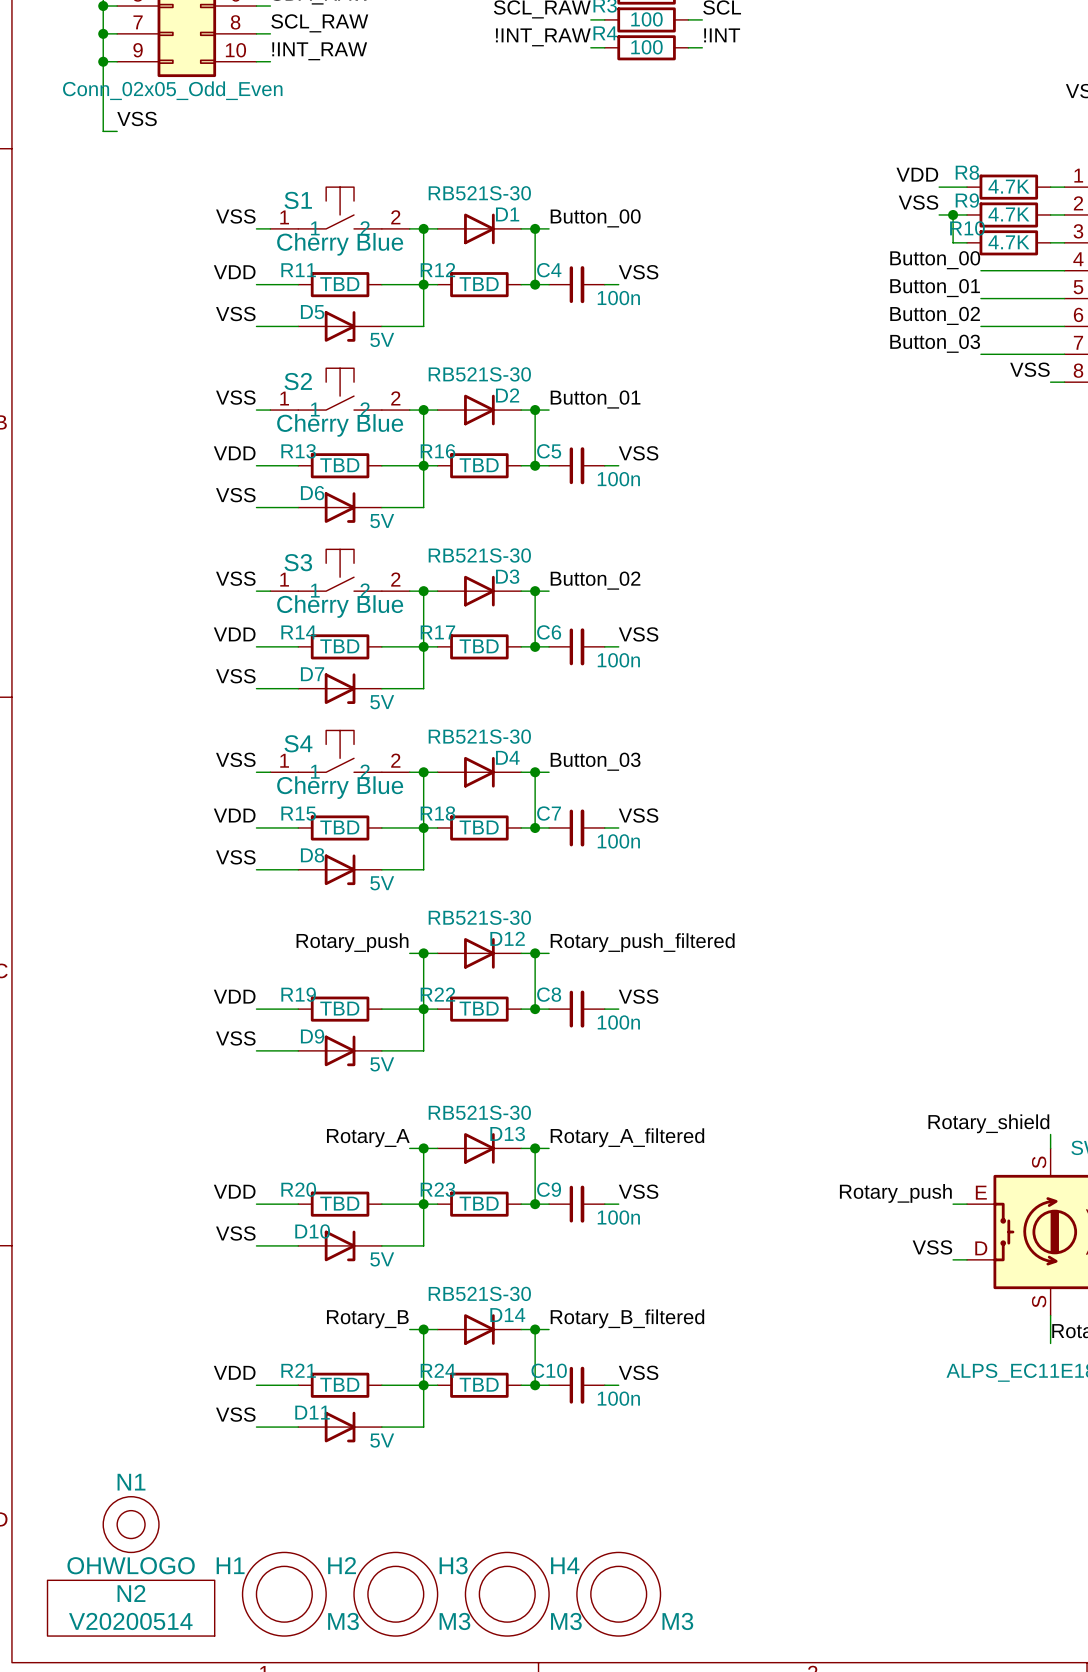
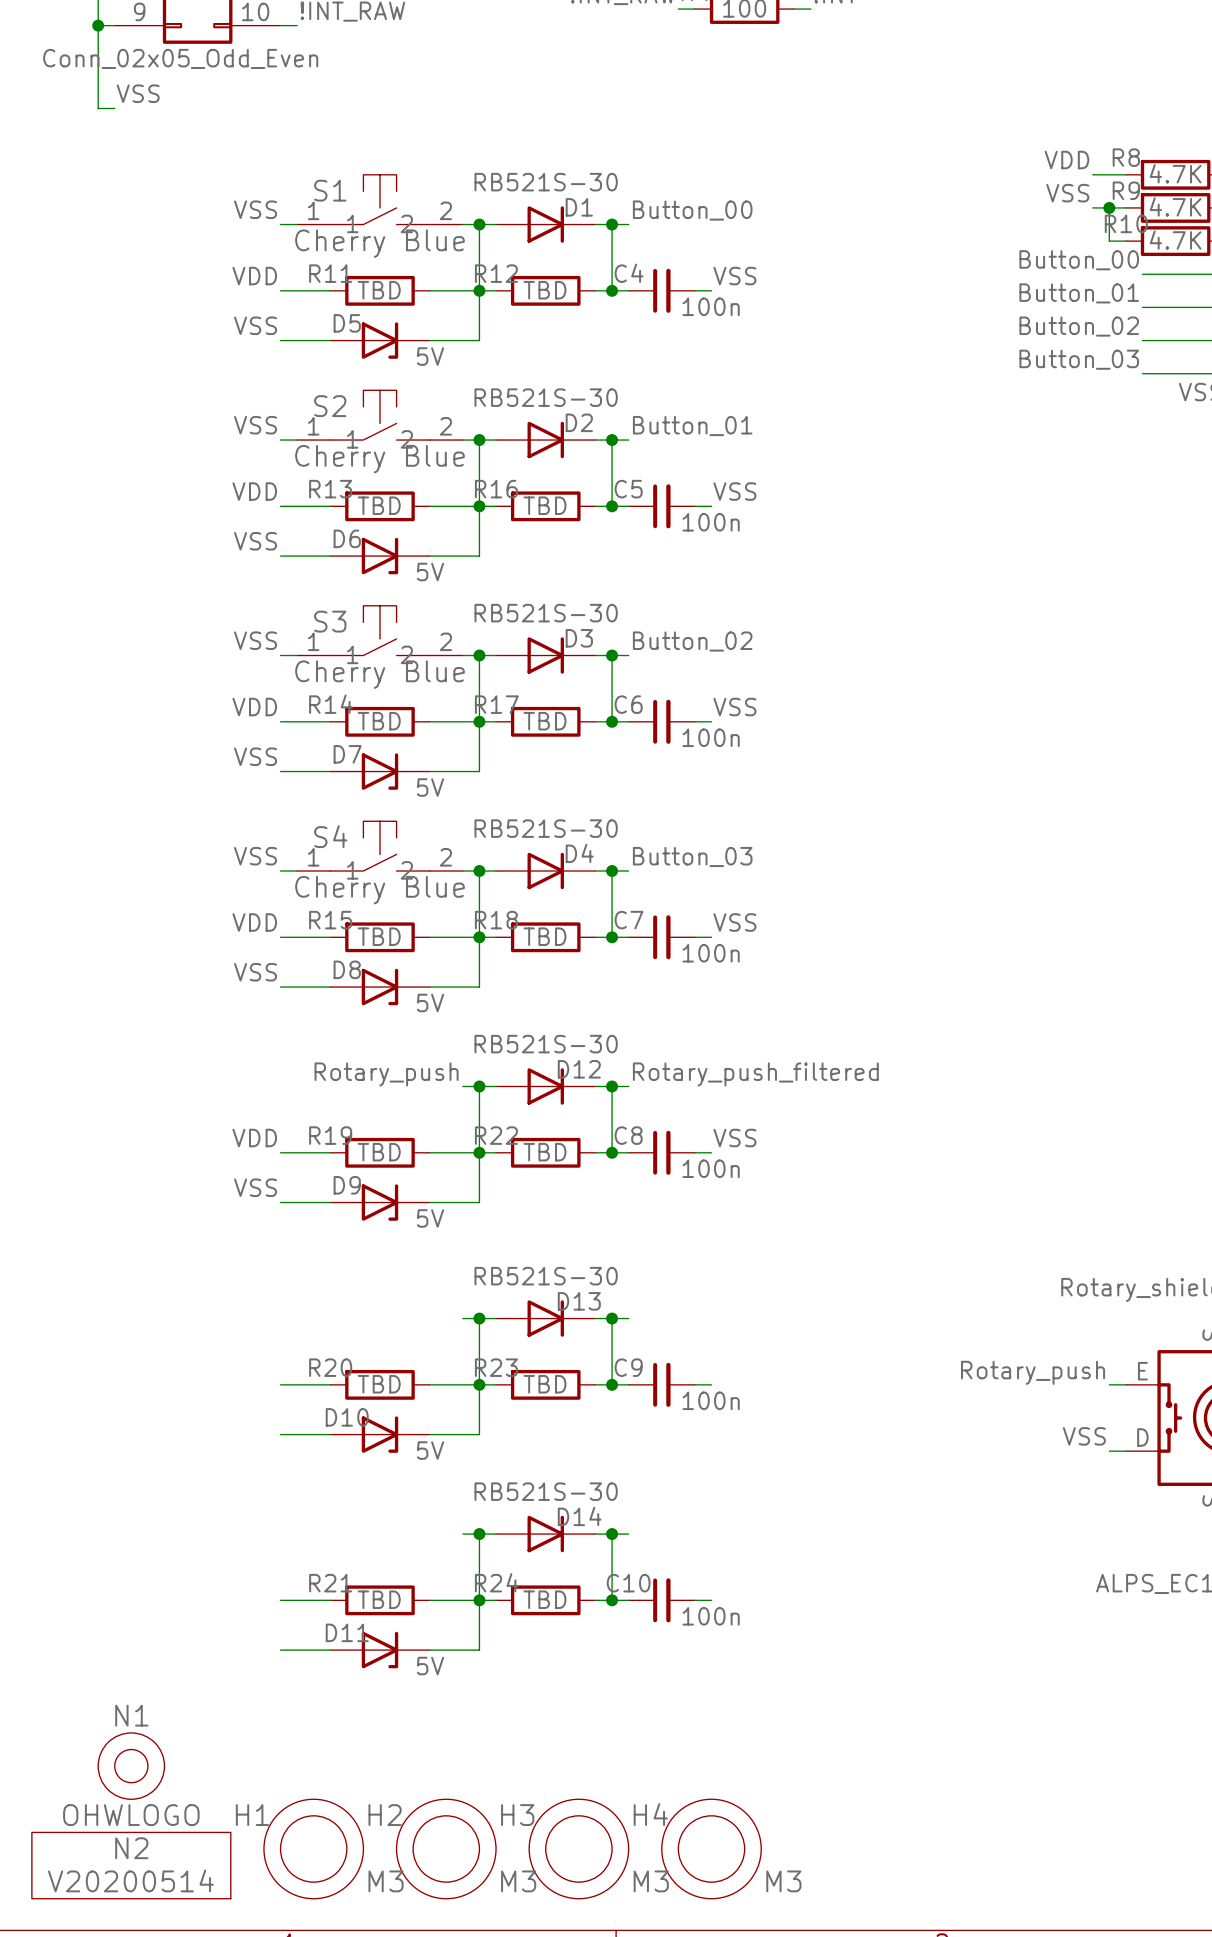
label: Rotary_A_filtered (627, 1137) -> none
label: Rotary_A (368, 1138) -> none
label: VDD (234, 1191) -> none
label: VSS (638, 1191) -> none
label: VSS (235, 1233) -> none
label: Rotary_B_filtered (627, 1318) -> none
label: Rotary_B (367, 1319) -> none
label: VDD (234, 1372) -> none
label: VSS (638, 1372) -> none
label: VSS (235, 1414) -> none

